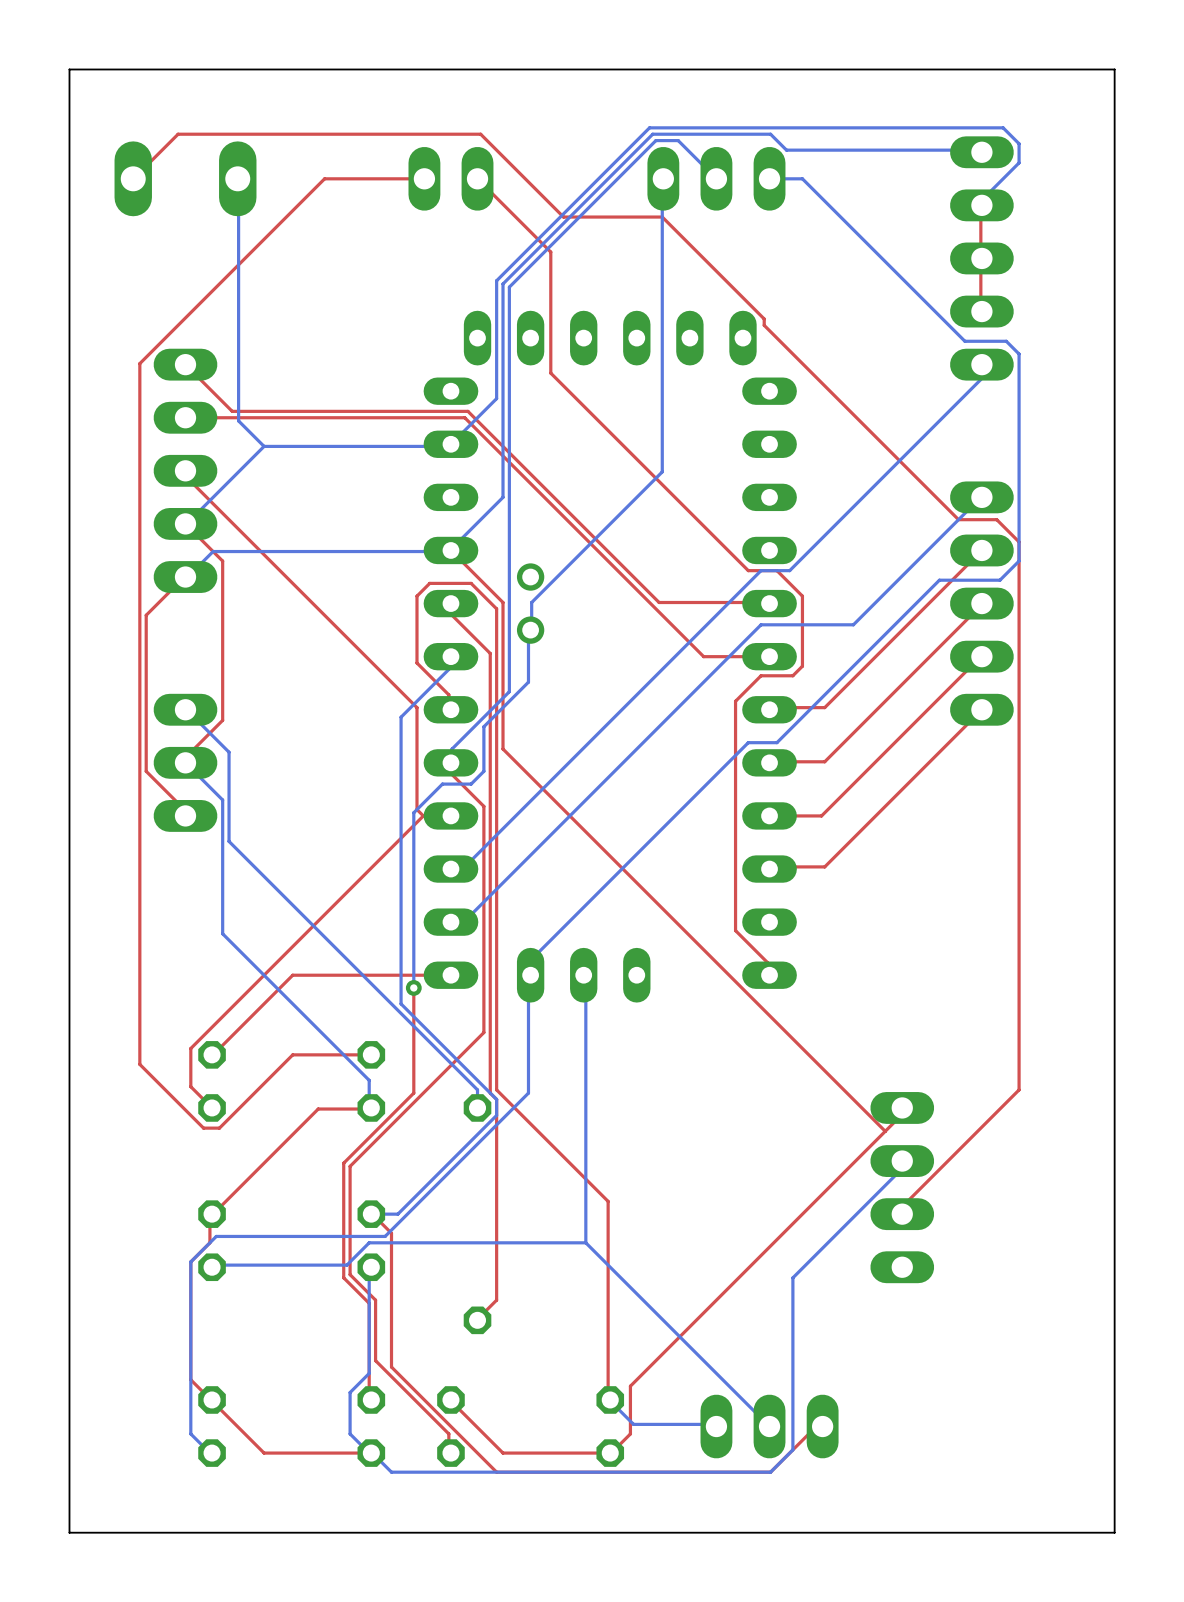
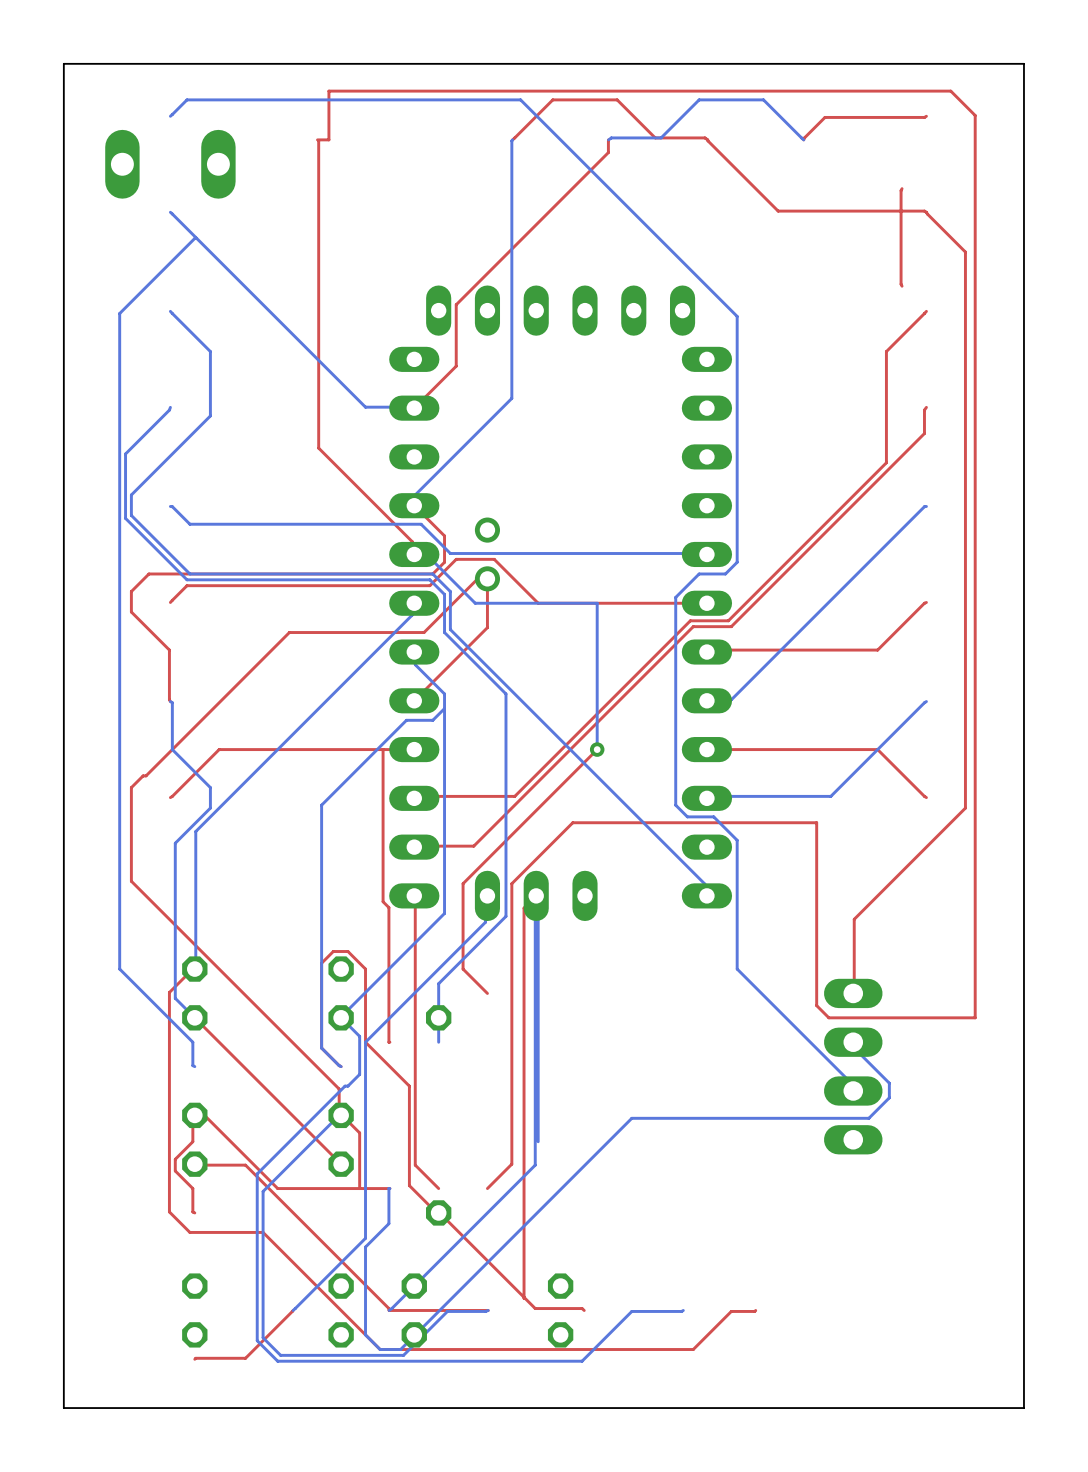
top track: none -> (926, 116) (824, 117) (803, 139)
top track: none -> (317, 139) (328, 139) (328, 91) (950, 91) (975, 115) (975, 1017) (828, 1017) (816, 1005) (816, 822) (572, 822) (511, 883) (511, 1164) (487, 1188)
top track: none -> (512, 139) (552, 99) (617, 99) (655, 137) (704, 137) (778, 211) (924, 211) (965, 252) (965, 808) (854, 919) (853, 993)
top track: none -> (608, 139) (608, 152) (456, 304) (456, 366) (414, 408)
bottom track: none -> (803, 139) (763, 99) (699, 99) (661, 137) (611, 137) (608, 139)
bottom track: (981, 152) (980, 150) (786, 150) (770, 134) (652, 134) (503, 283) (503, 497) (452, 548) -> (512, 139) (511, 398) (415, 494) (415, 503)
top track: (133, 178) (178, 134) (480, 134) (563, 217) (662, 217) (764, 318) (764, 325) (958, 519) (996, 519) (1019, 541) (1019, 1089) (904, 1204) (904, 1214) (902, 1214) -> none
bottom track: (237, 178) (238, 420) (264, 446) -> none
top track: (424, 178) (324, 178) (139, 363) (139, 1064) (203, 1128) (219, 1128) (292, 1054) (371, 1054) -> none
part: (450, 178) -> none
top track: (477, 178) (550, 252) (550, 373) (748, 570) (776, 570) (802, 596) (802, 666) -> (926, 311) (886, 351) (886, 462) (737, 612)
bottom track: (663, 178) (662, 471) (531, 602) (531, 627) (528, 631) (528, 682) (483, 726) (483, 755) -> (414, 652) (415, 664) (444, 693)
bottom track: (716, 178) (678, 140) (655, 140) (509, 287) (509, 691) (452, 749) (450, 762) -> none
part: (716, 178) -> none
bottom track: (769, 178) (802, 178) (964, 341) (1006, 341) (1019, 354) (1019, 561) (999, 580) (939, 580) (776, 742) (748, 742) (531, 959) (530, 975) -> none
bottom track: (981, 205) (984, 204) (984, 197) (1019, 162) (1019, 143) (1003, 127) (649, 127) (496, 280) (496, 398) (448, 446) (264, 446) -> none
bottom track: none -> (170, 212) (365, 407) (414, 408)
bottom track: none -> (195, 237) (119, 313) (119, 969) (192, 1042) (192, 1065) (194, 1066)
part: (981, 258) -> none
bottom track: none -> (170, 311) (210, 351) (210, 415) (131, 494) (131, 515) (189, 573) (432, 573) (450, 591) (450, 629) (704, 884) (704, 895) (706, 895)
top track: (185, 364) (232, 411) (467, 411) (659, 602) (769, 603) -> none
bottom track: (981, 364) (980, 379) (789, 570) (761, 570) (464, 866) (452, 866) (450, 869) -> none
top track: (185, 417) (464, 417) (703, 656) -> (170, 602) (186, 585) (429, 585) (456, 559) (494, 559) (538, 603) (646, 603)
bottom track: (264, 446) (185, 523) -> none
top track: (185, 470) (187, 471) (187, 478) (416, 707) (416, 809) (423, 815) (190, 1048) (190, 1086) (212, 1107) -> (341, 1164) (194, 1017)
part: (185, 470) -> none
bottom track: (981, 497) (853, 624) (789, 624) -> (170, 116) (186, 99) (520, 99) (737, 316) (737, 562) (725, 573)
top track: (185, 523) (222, 561) (222, 720) (187, 755) (187, 761) (185, 762) -> (444, 535) (444, 562) (432, 573) (148, 573) (131, 591) (131, 612) (169, 650) (170, 701)
bottom track: (450, 550) (213, 551) (185, 577) -> none
top track: (981, 550) (824, 707) -> (926, 602) (877, 650) (757, 650)
bottom track: none -> (170, 506) (189, 524) (421, 524) (450, 553) (706, 554)
bottom track: none -> (926, 506) (731, 699) (706, 700)
top track: (185, 577) (146, 615) (146, 771) (184, 809) (185, 815) -> none
top track: (483, 583) (503, 602) (503, 749) (885, 1131) -> none
top track: (450, 603) (452, 615) (490, 653) (490, 1093) (496, 1099) (496, 1300) (477, 1320) -> (414, 554) (412, 553) (412, 541) (318, 448) (318, 140)
bottom track: none -> (414, 554) (426, 554) (475, 603) (597, 603) (597, 749)
top track: (981, 603) (824, 761) (769, 762) -> none
part: (981, 603) -> none
bottom track: (735, 650) (464, 921) (450, 922) -> (675, 597) (675, 805) (687, 816) (713, 816) (737, 840) (737, 969) (851, 1083) (853, 1091)
top track: (981, 656) (821, 815) -> (926, 797) (877, 749) (754, 749)
top track: (761, 675) (754, 682) -> (926, 407) (924, 410) (924, 433) (731, 626) (693, 626)
top track: none -> (699, 620) (690, 620) (514, 796) (415, 796) (414, 798)
top track: (735, 701) (735, 930) (767, 962) (767, 975) (769, 975) -> (675, 644) (473, 846) (414, 847)
bottom track: (185, 709) (229, 752) (229, 841) (477, 1089) -> (170, 407) (125, 453) (125, 518) (186, 579) (429, 579) (444, 594) (444, 632) (505, 693) (505, 916) (438, 983) (438, 1001)
top track: (450, 709) (448, 707) (448, 694) (416, 663) (416, 596) (429, 583) (471, 583) (496, 608) (496, 1089) (608, 1201) (608, 1398) (610, 1399) -> none
top track: (981, 709) (824, 866) (770, 866) (769, 869) -> none
bottom track: (401, 717) (401, 1003) (496, 1099) (496, 1115) (397, 1214) (371, 1214) -> (368, 658) (195, 831) (194, 969)
bottom track: (185, 762) (222, 800) (222, 933) (369, 1080) (369, 1105) (371, 1107) -> (170, 701) (172, 702) (172, 749) (210, 787) (210, 808) (175, 843) (175, 998) (194, 1017)
part: (185, 762) -> none
top track: (450, 762) (452, 774) (483, 806) (483, 1032) (350, 1166) (350, 1274) (375, 1300) (375, 1360) (448, 1433) (448, 1453) (450, 1453) -> (414, 700) (487, 627) (487, 578) (476, 579) (424, 632) (289, 632) (146, 775) (143, 775) (131, 787) (131, 881) (339, 1089) (339, 1115) (341, 1115)
bottom track: none -> (926, 701) (830, 796) (707, 796) (706, 798)
bottom track: none -> (444, 708) (444, 913) (342, 1015) (341, 1017) (359, 1036) (359, 1074) (347, 1086) (345, 1086) (257, 1173) (257, 1340) (277, 1361) (582, 1361) (631, 1311) (683, 1310)
bottom track: (413, 812) (413, 987) -> (380, 746) (321, 805) (321, 1048) (341, 1066)
top track: none -> (383, 749) (383, 901) (388, 907) (389, 1042)
top track: none -> (388, 749) (219, 749) (170, 797)
top track: none -> (597, 749) (463, 883) (463, 969) (487, 993)
via: none -> (597, 749)
top track: (450, 975) (292, 975) (212, 1054) -> (414, 895) (415, 1165) (438, 1188)
bottom track: none -> (535, 895) (535, 1165) (389, 1310)
top track: none -> (536, 895) (524, 908) (524, 1297)
top track: (413, 987) (413, 1093) (343, 1163) (343, 1277) (369, 1303) (369, 1398) (371, 1399) -> none
via: (413, 987) -> none
bottom track: (528, 1003) (528, 1093) (385, 1236) (216, 1236) (190, 1261) (190, 1433) (212, 1453) -> (485, 922) (365, 1042) (365, 1238) (293, 1310)
top track: (371, 1107) (318, 1109) (213, 1214) -> (389, 1188) (277, 1188) (204, 1115) (195, 1115)
bottom track: none -> (438, 1017) (438, 1042)
top track: (902, 1107) (901, 1115) (630, 1386) (630, 1433) (611, 1453) (503, 1453) (450, 1399) -> none
bottom track: none -> (853, 1042) (854, 1048) (889, 1083) (889, 1097) (868, 1118) (631, 1118) (400, 1349) (380, 1349) (365, 1334) (365, 1247) (388, 1223) (389, 1188)
top track: none -> (341, 1066) (321, 1048) (321, 963) (333, 951) (347, 951) (365, 969) (365, 1042) (409, 1086) (409, 1185) (429, 1206) (432, 1206) (535, 1308) (582, 1308) (584, 1310)
bottom track: (902, 1161) (901, 1169) (792, 1277) (792, 1449) (770, 1472) (391, 1472) (350, 1433) (350, 1392) (369, 1373) (369, 1268) (371, 1267) -> none
part position: (902, 1187) -> (853, 1066)
bottom track: none -> (341, 1115) (263, 1191) (263, 1337) (280, 1355) (403, 1355) (447, 1311) (488, 1310)
top track: none -> (194, 1164) (245, 1165) (389, 1310) (488, 1310)
bottom track: (212, 1267) (213, 1265) (346, 1265) (369, 1242) (585, 1242) (769, 1426) -> none
top track: (190, 1274) (190, 1379) (264, 1453) (371, 1453) -> (175, 1170) (192, 1188) (192, 1211) (194, 1212)
top track: (391, 1293) (391, 1367) (496, 1472) (770, 1472) (815, 1427) -> (194, 969) (169, 992) (169, 1211) (189, 1232) (263, 1232) (380, 1349) (693, 1349) (731, 1311) (748, 1311)
bottom track: (610, 1399) (633, 1424) (716, 1424) (716, 1426) -> none
top track: none -> (293, 1310) (245, 1358) (194, 1359)
part: (769, 1426) -> none

